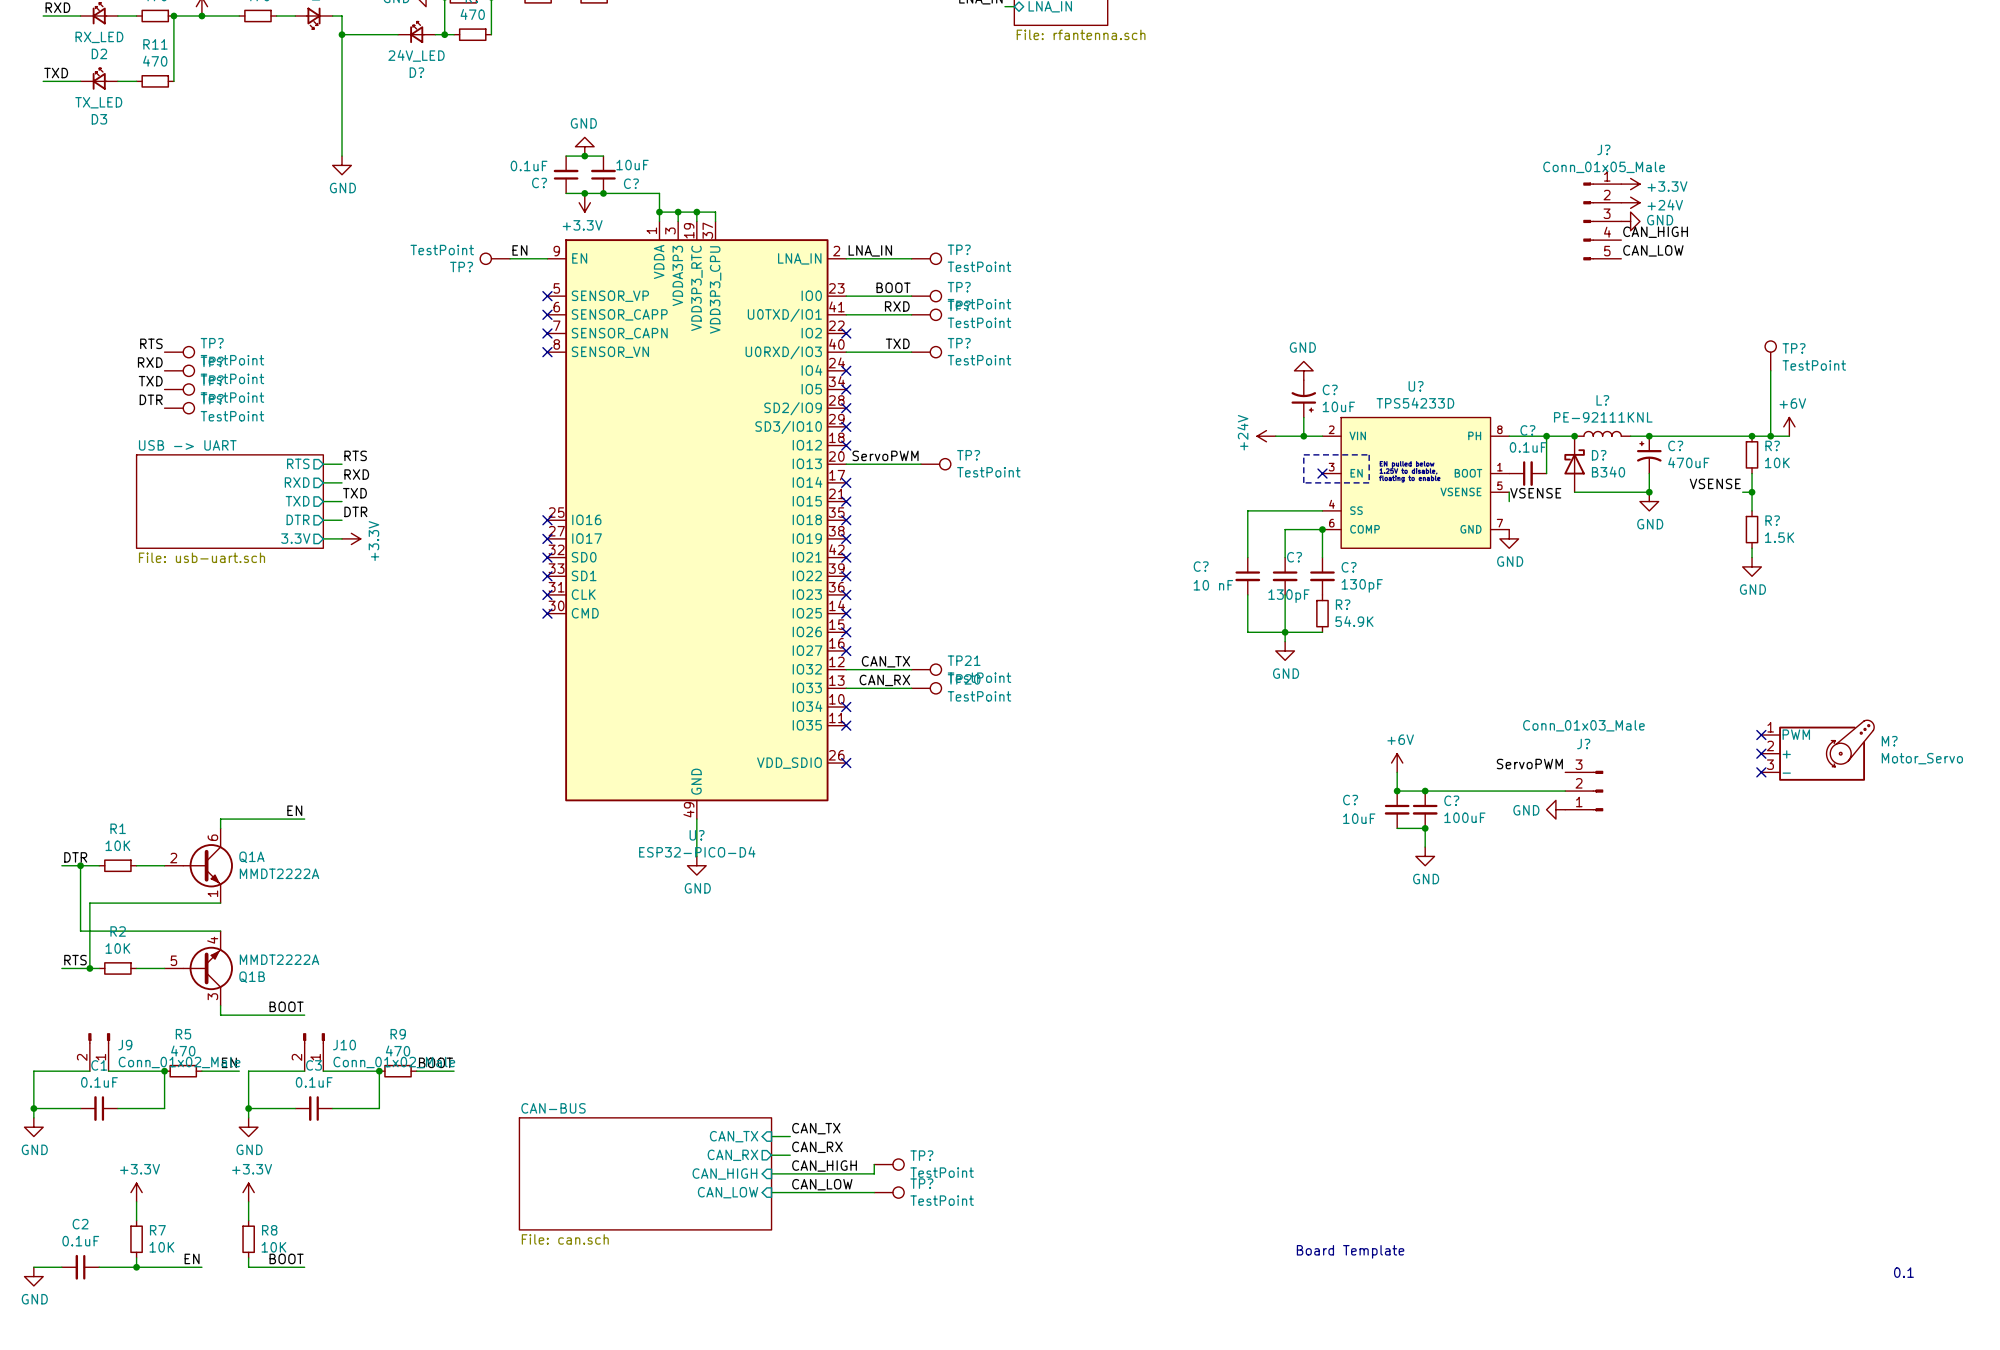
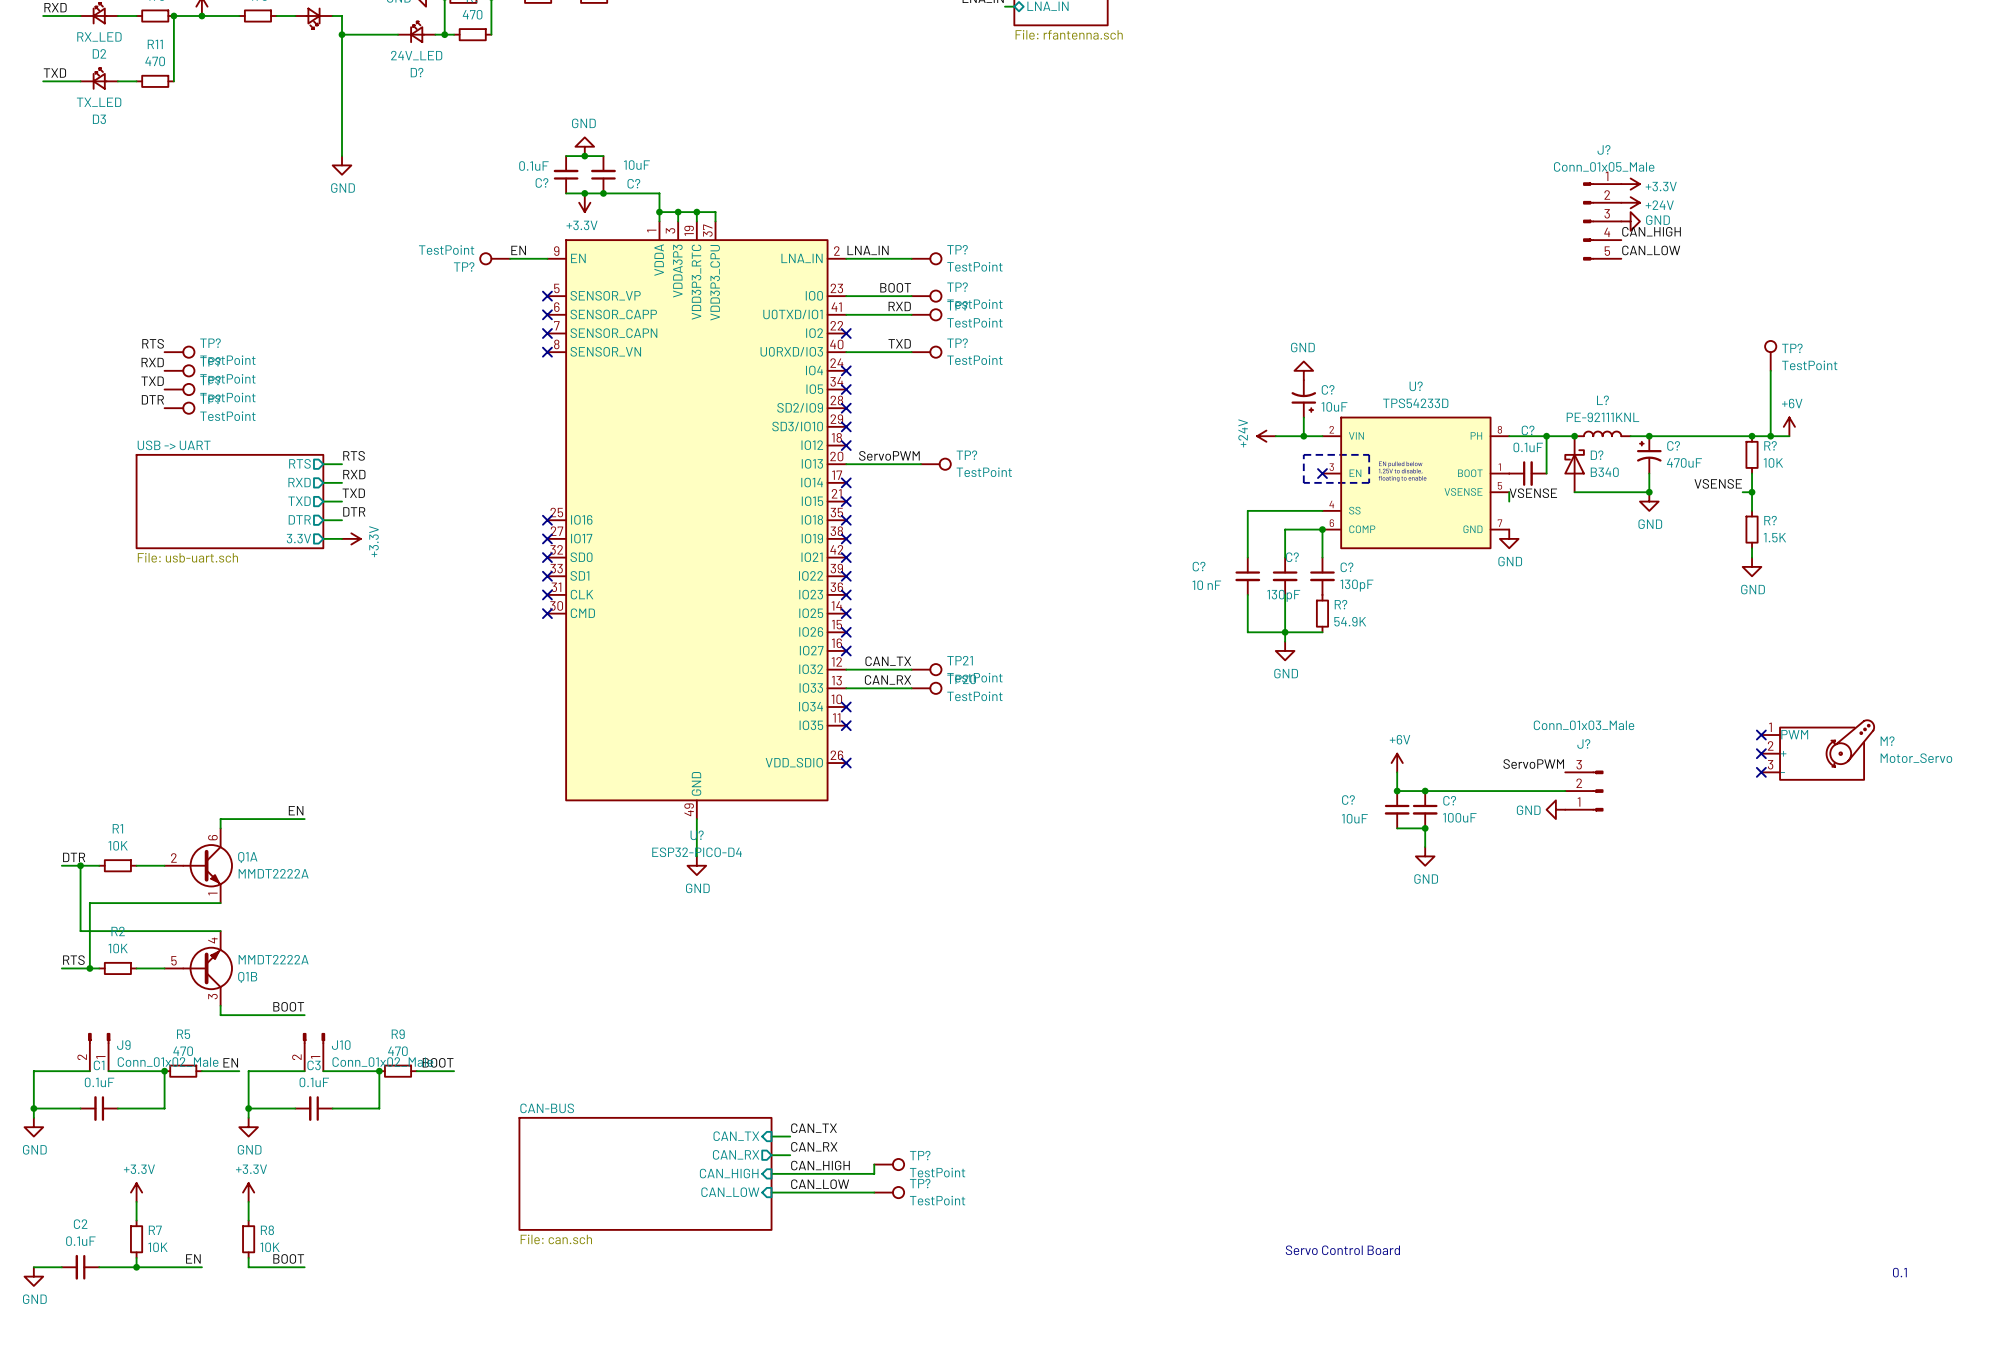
text: none -> Servo Control Board (1342, 1250)
text: Board Template (1350, 1251) -> none

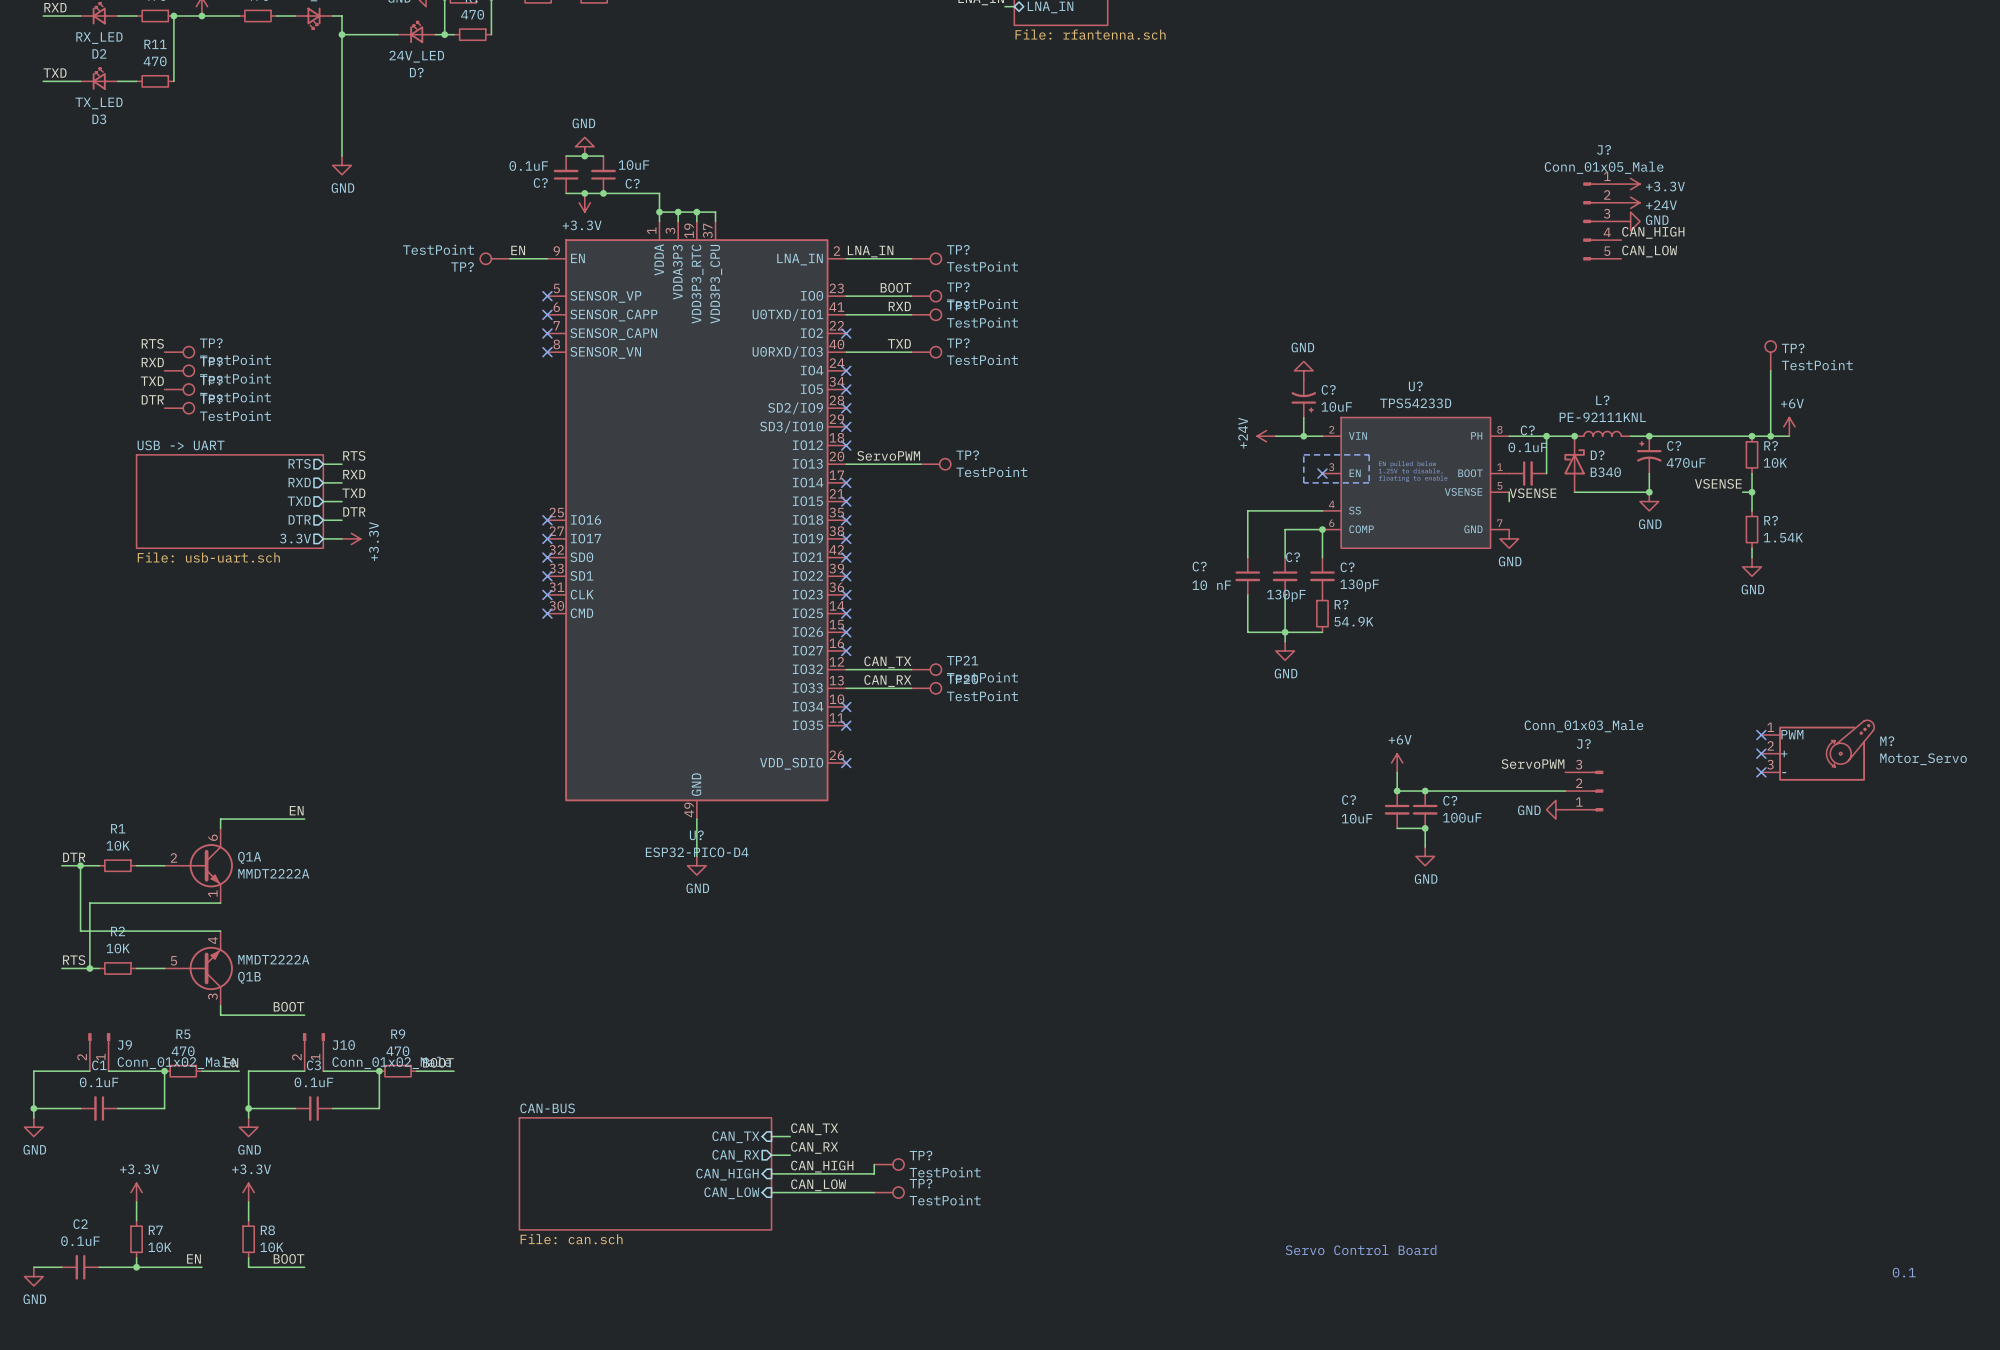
R? value: 1.5K (1774, 537) -> 1.54K (1783, 537)

